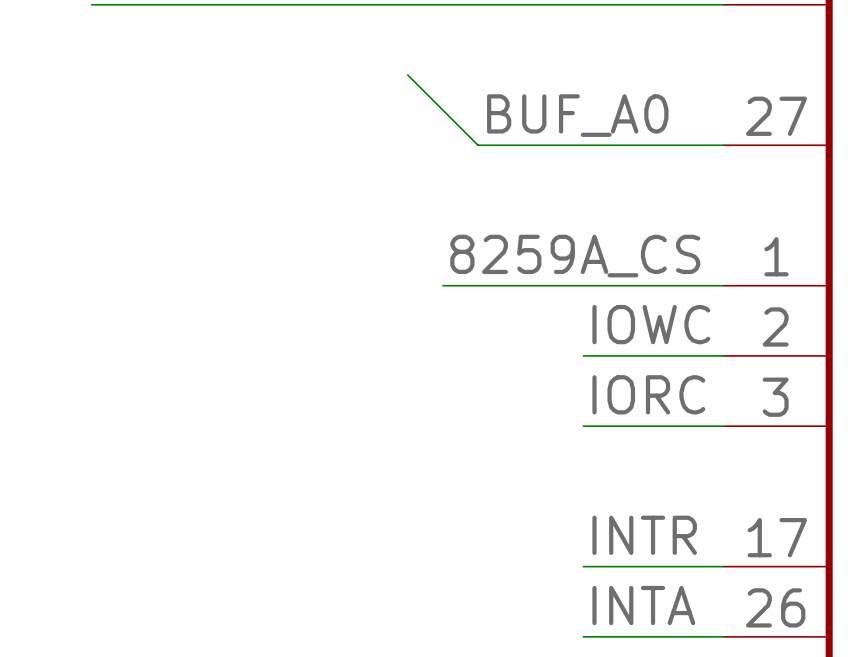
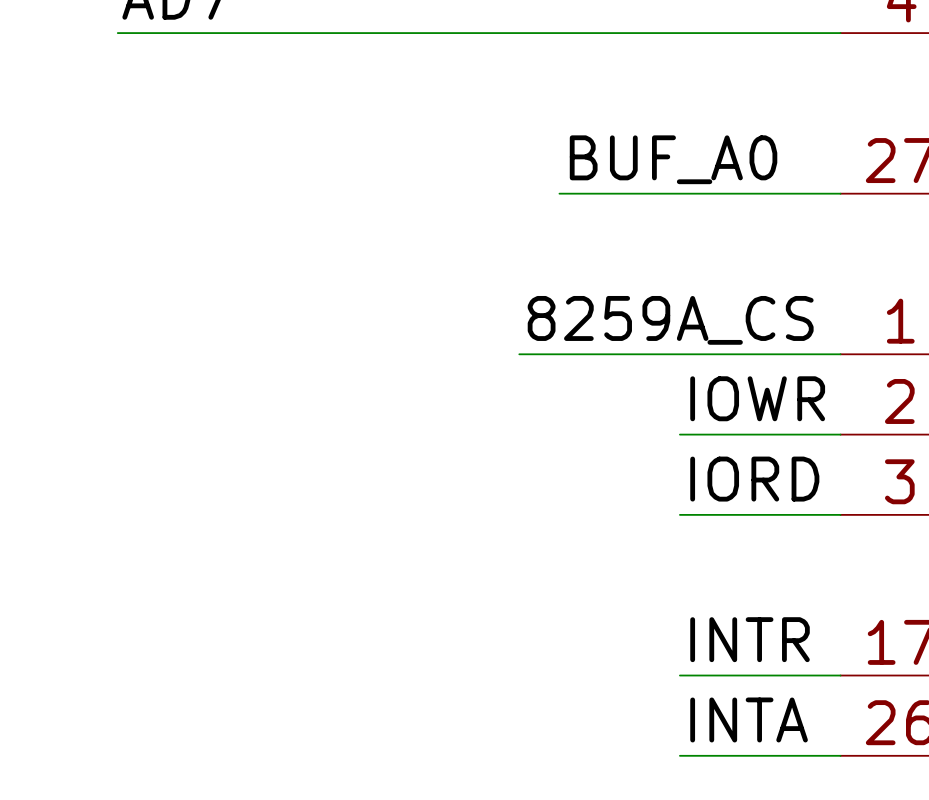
wire: (407, 75) (478, 145) -> none
label: IOWC (651, 324) -> IOWR (757, 398)
label: IORC (648, 394) -> IORD (754, 479)

